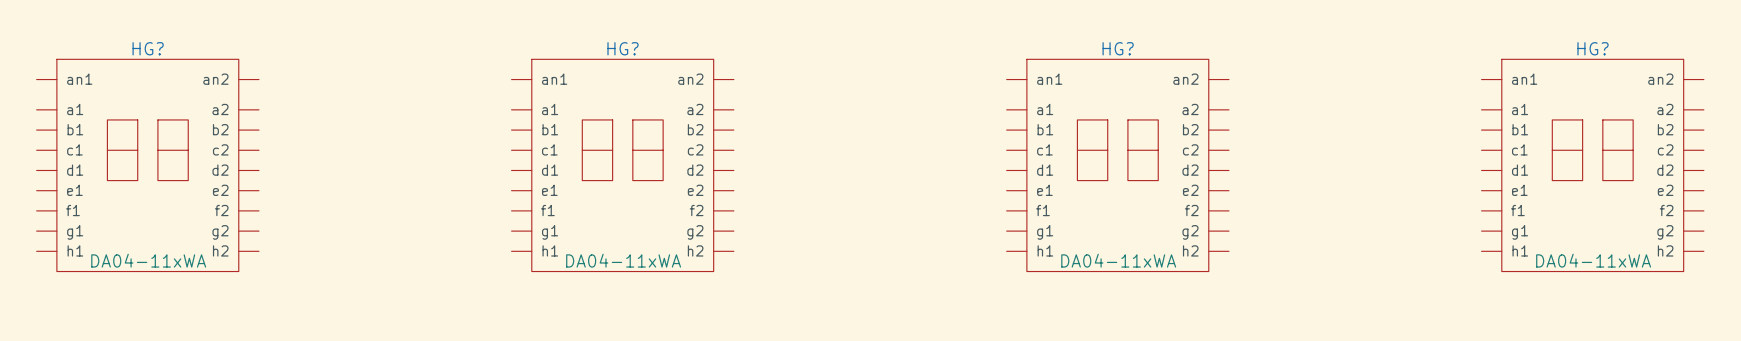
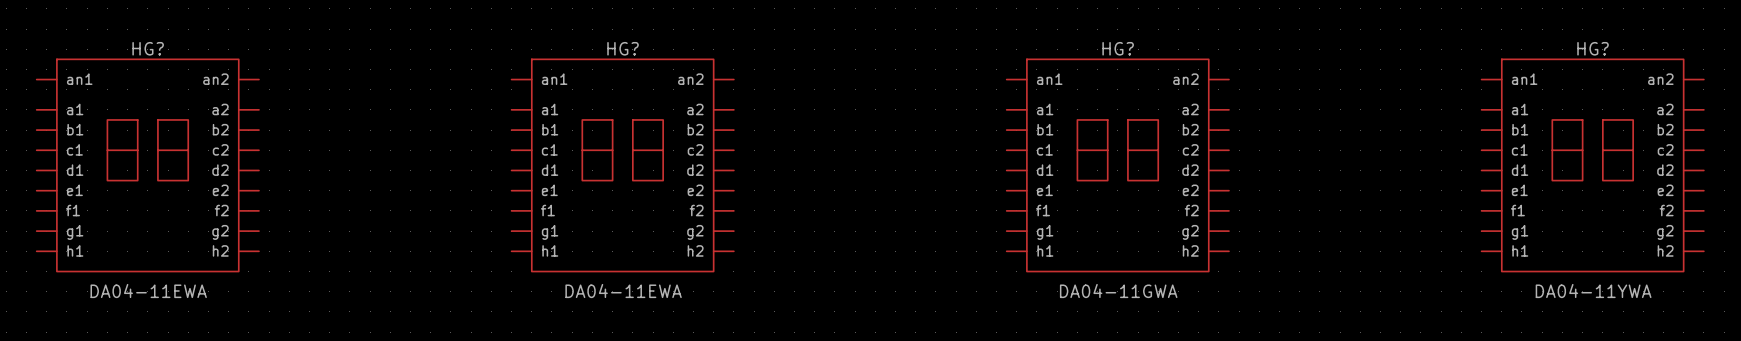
HG? value: DA04-11xWA (148, 260) -> DA04-11EWA (148, 290)
HG? value: DA04-11xWA (623, 260) -> DA04-11EWA (623, 290)
HG? value: DA04-11xWA (1118, 260) -> DA04-11GWA (1118, 290)
HG? value: DA04-11xWA (1593, 260) -> DA04-11YWA (1593, 290)

